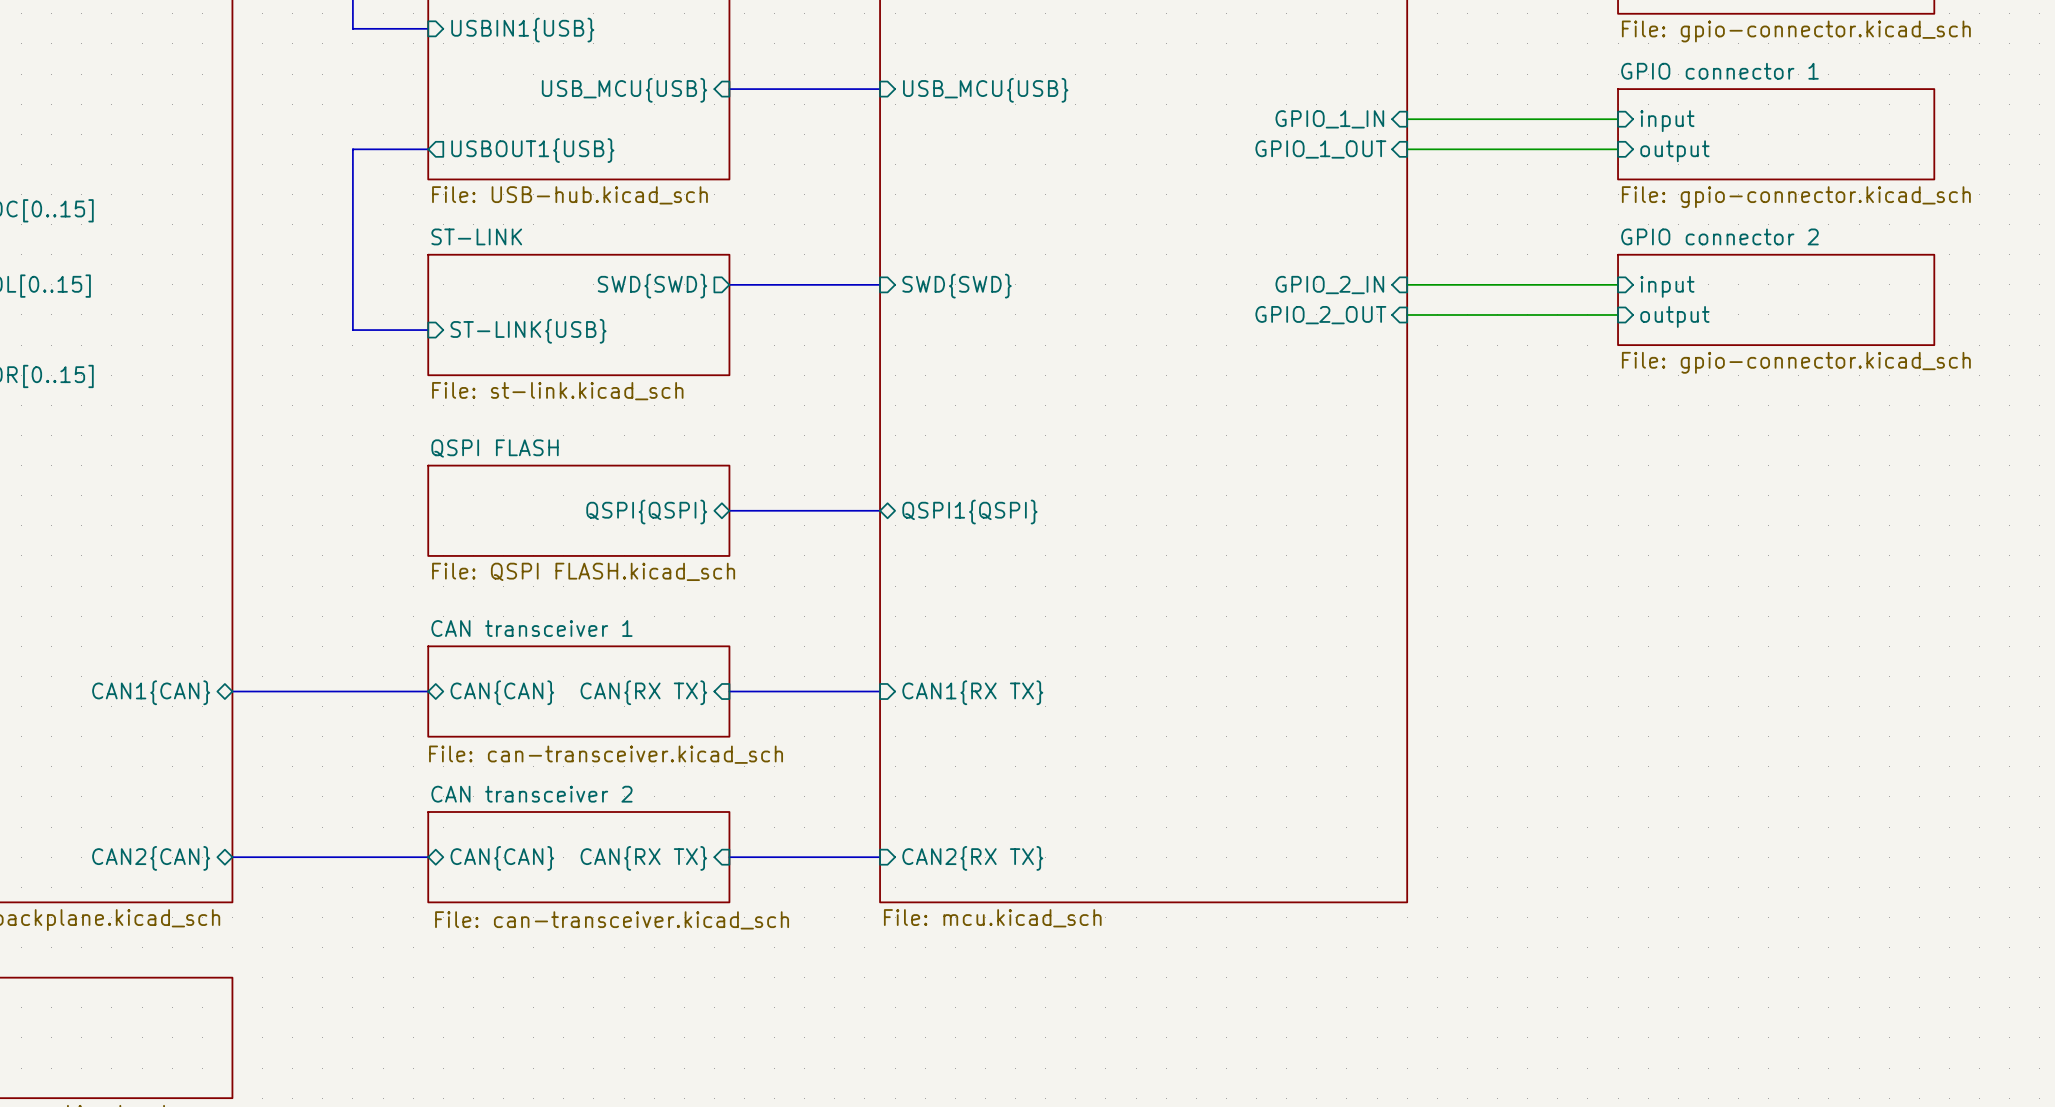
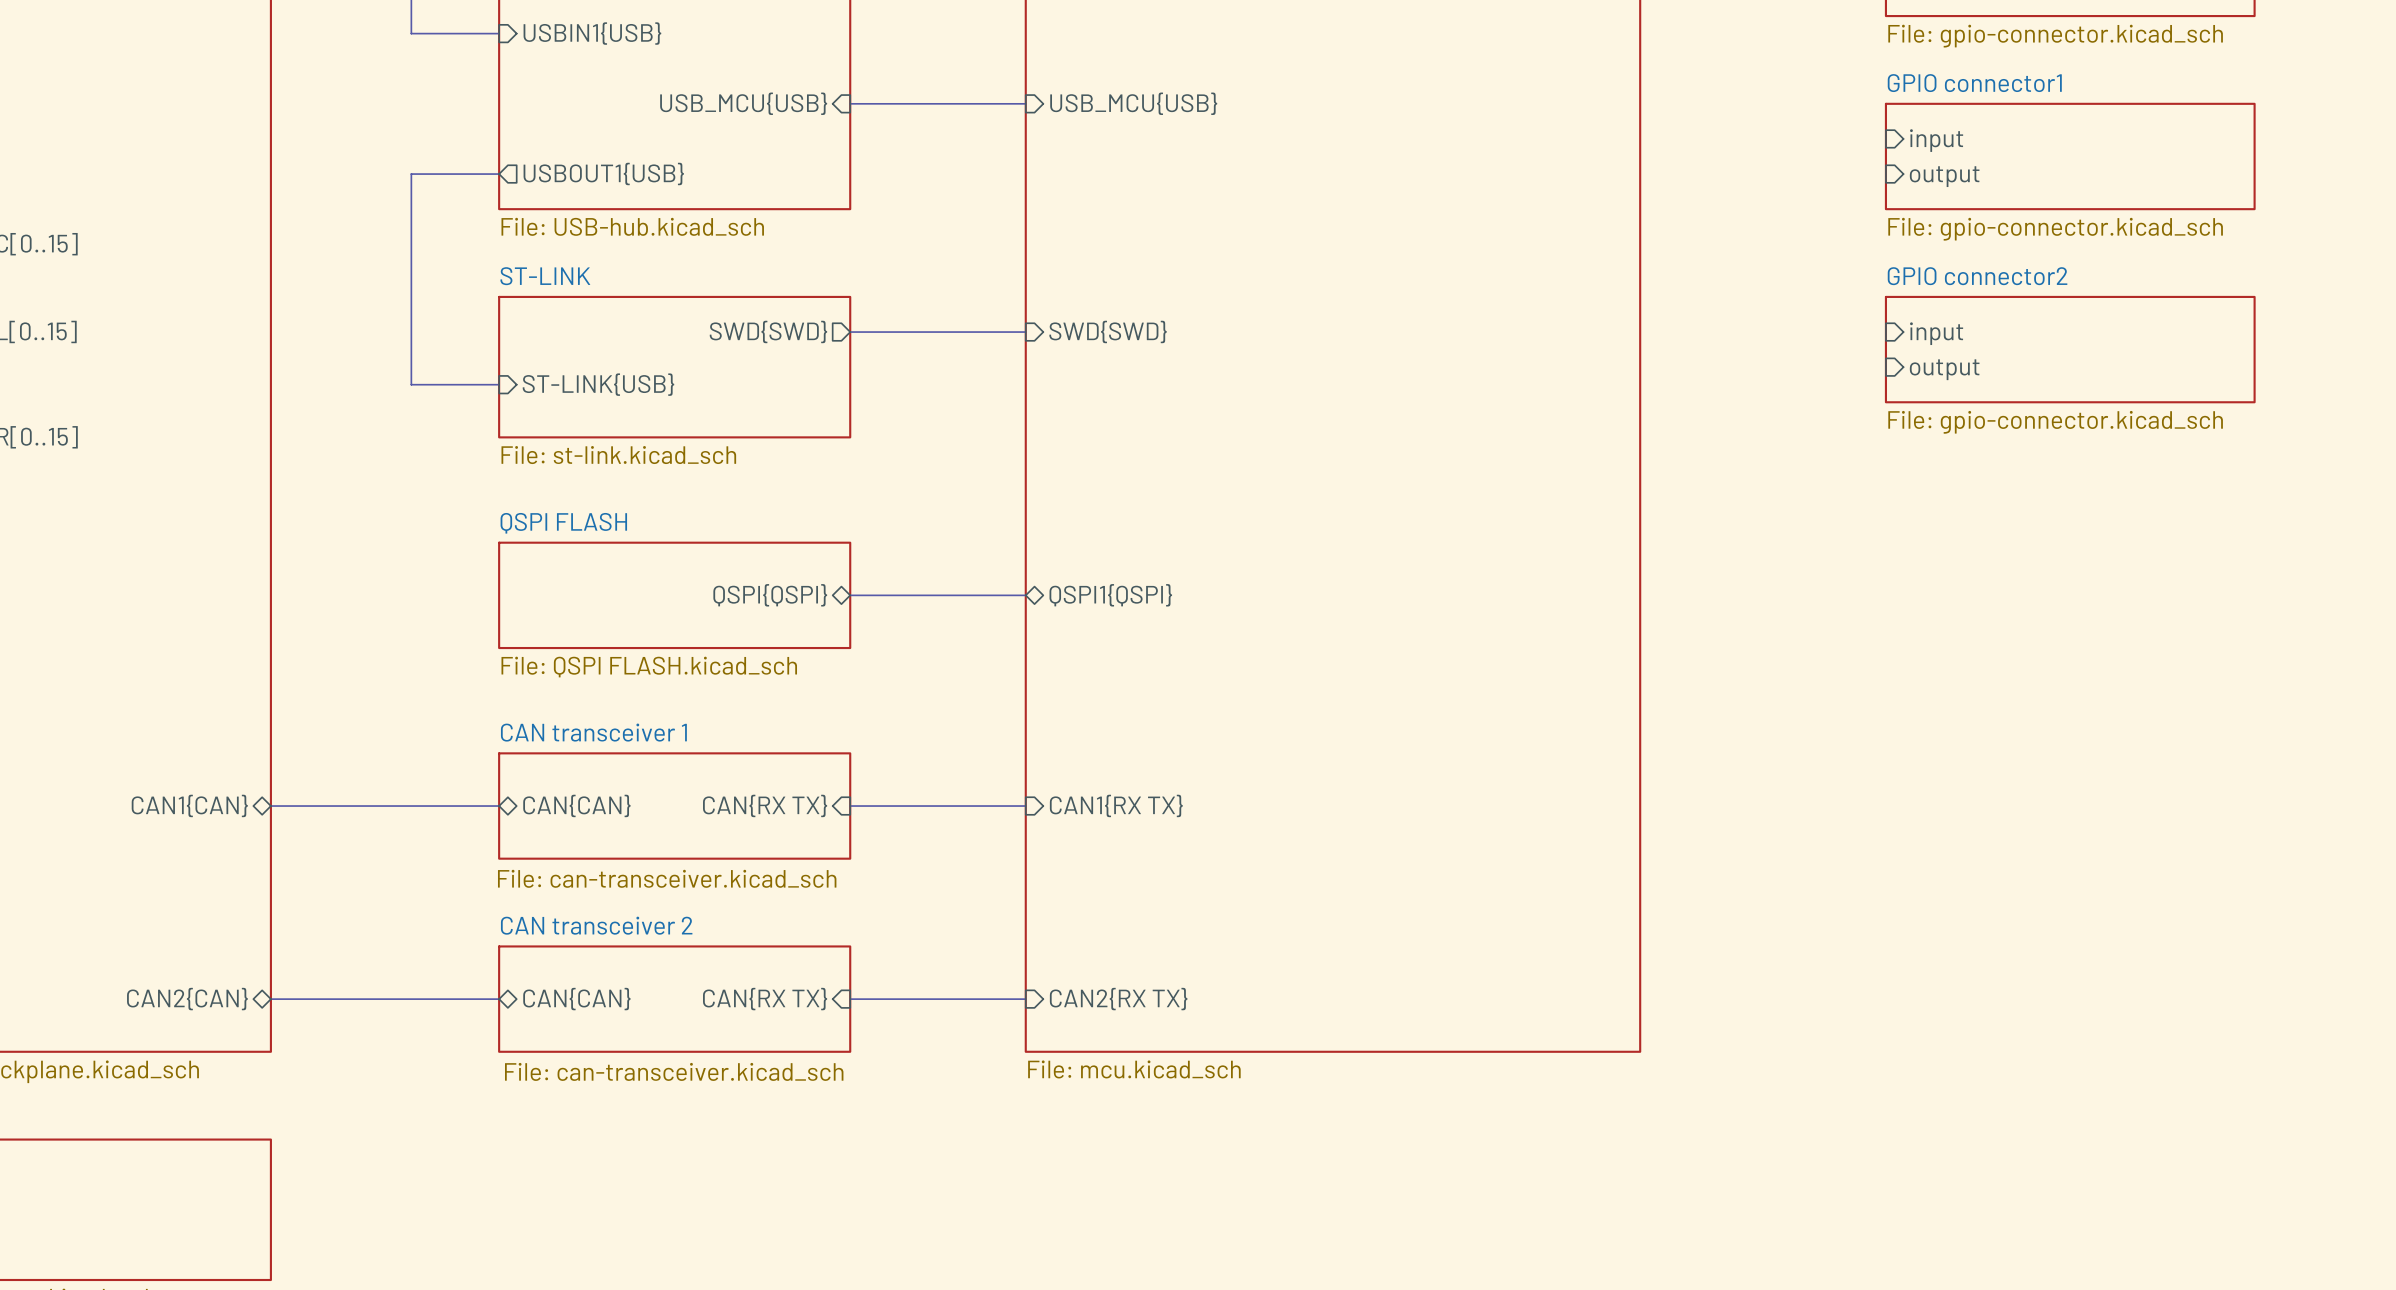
sheet GPIO connector 1 name: GPIO connector 1 (1719, 71) -> GPIO connector1 (1974, 83)
sheet pin: GPIO_1_IN (1329, 119) -> none
wire: (1407, 119) (1618, 119) -> none
sheet pin: GPIO_1_OUT (1320, 149) -> none
wire: (1407, 149) (1618, 149) -> none
sheet GPIO connector 2 name: GPIO connector 2 (1719, 236) -> GPIO connector2 (1977, 276)
wire: (1407, 284) (1618, 284) -> none
sheet pin: GPIO_2_IN (1329, 285) -> none
wire: (1407, 314) (1618, 314) -> none
sheet pin: GPIO_2_OUT (1320, 315) -> none

